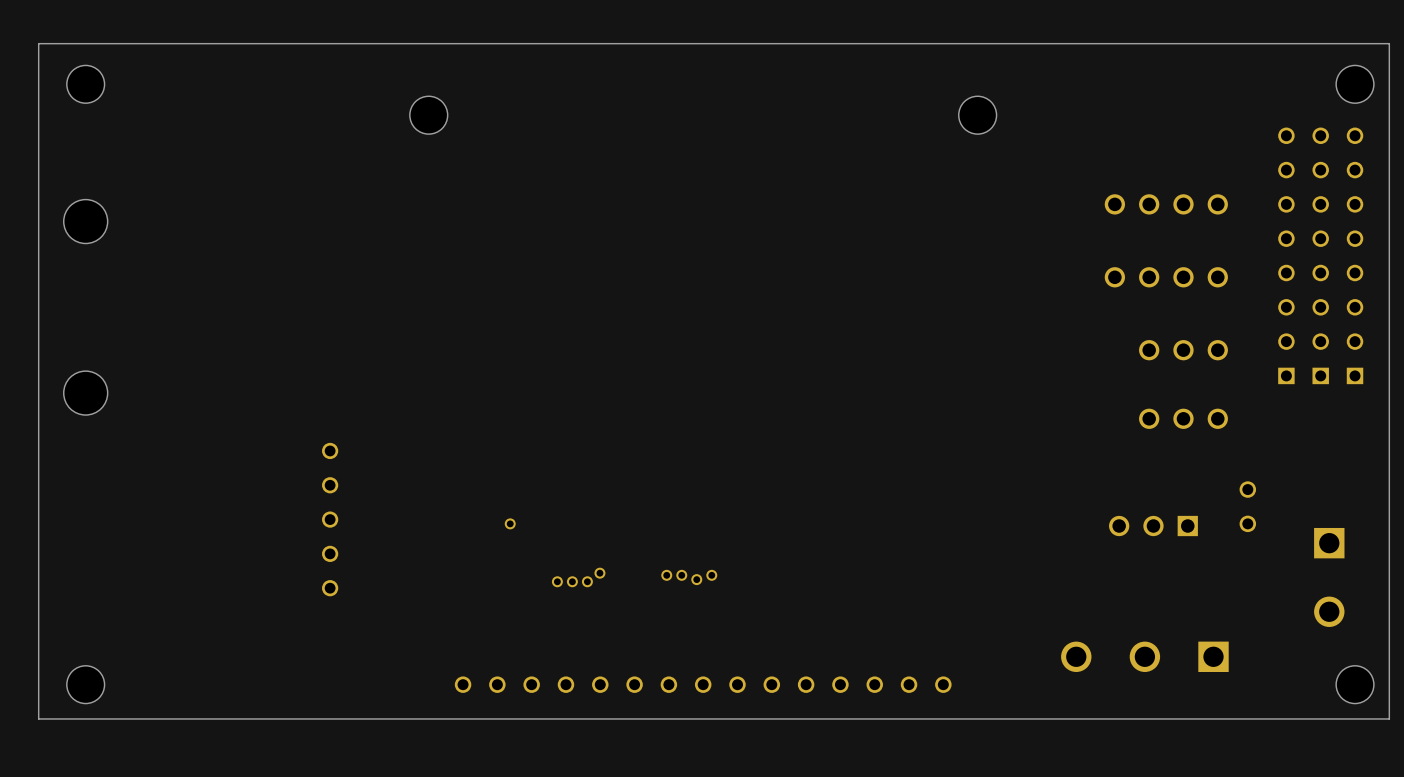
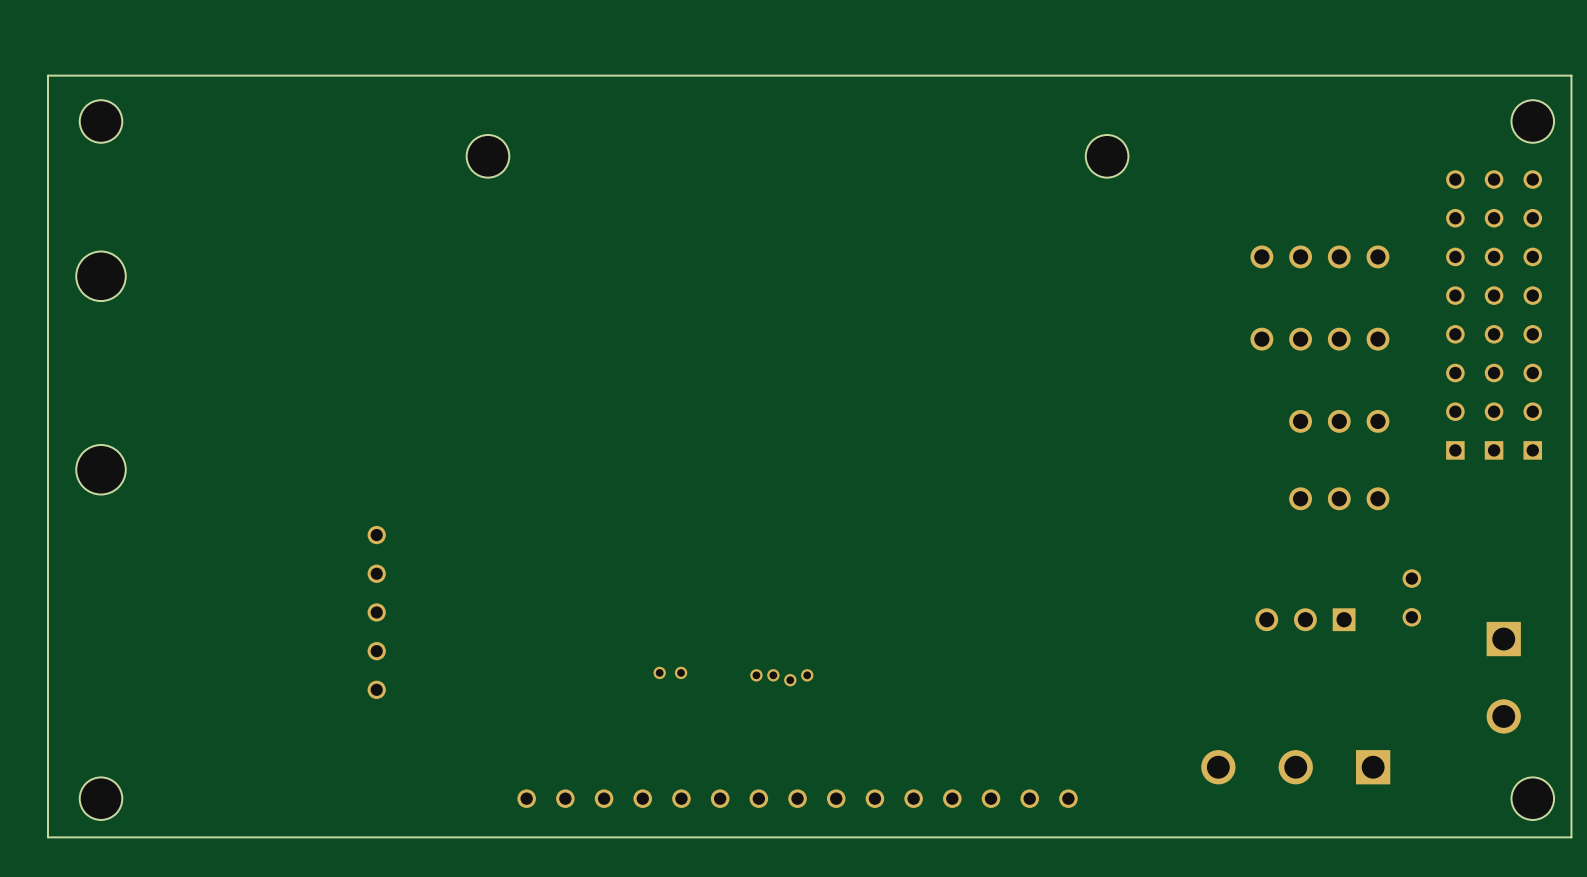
part: (510, 523) -> none
part: none -> (659, 672)
part: (557, 581) -> none
part: (572, 581) -> none
part: (587, 581) -> none

